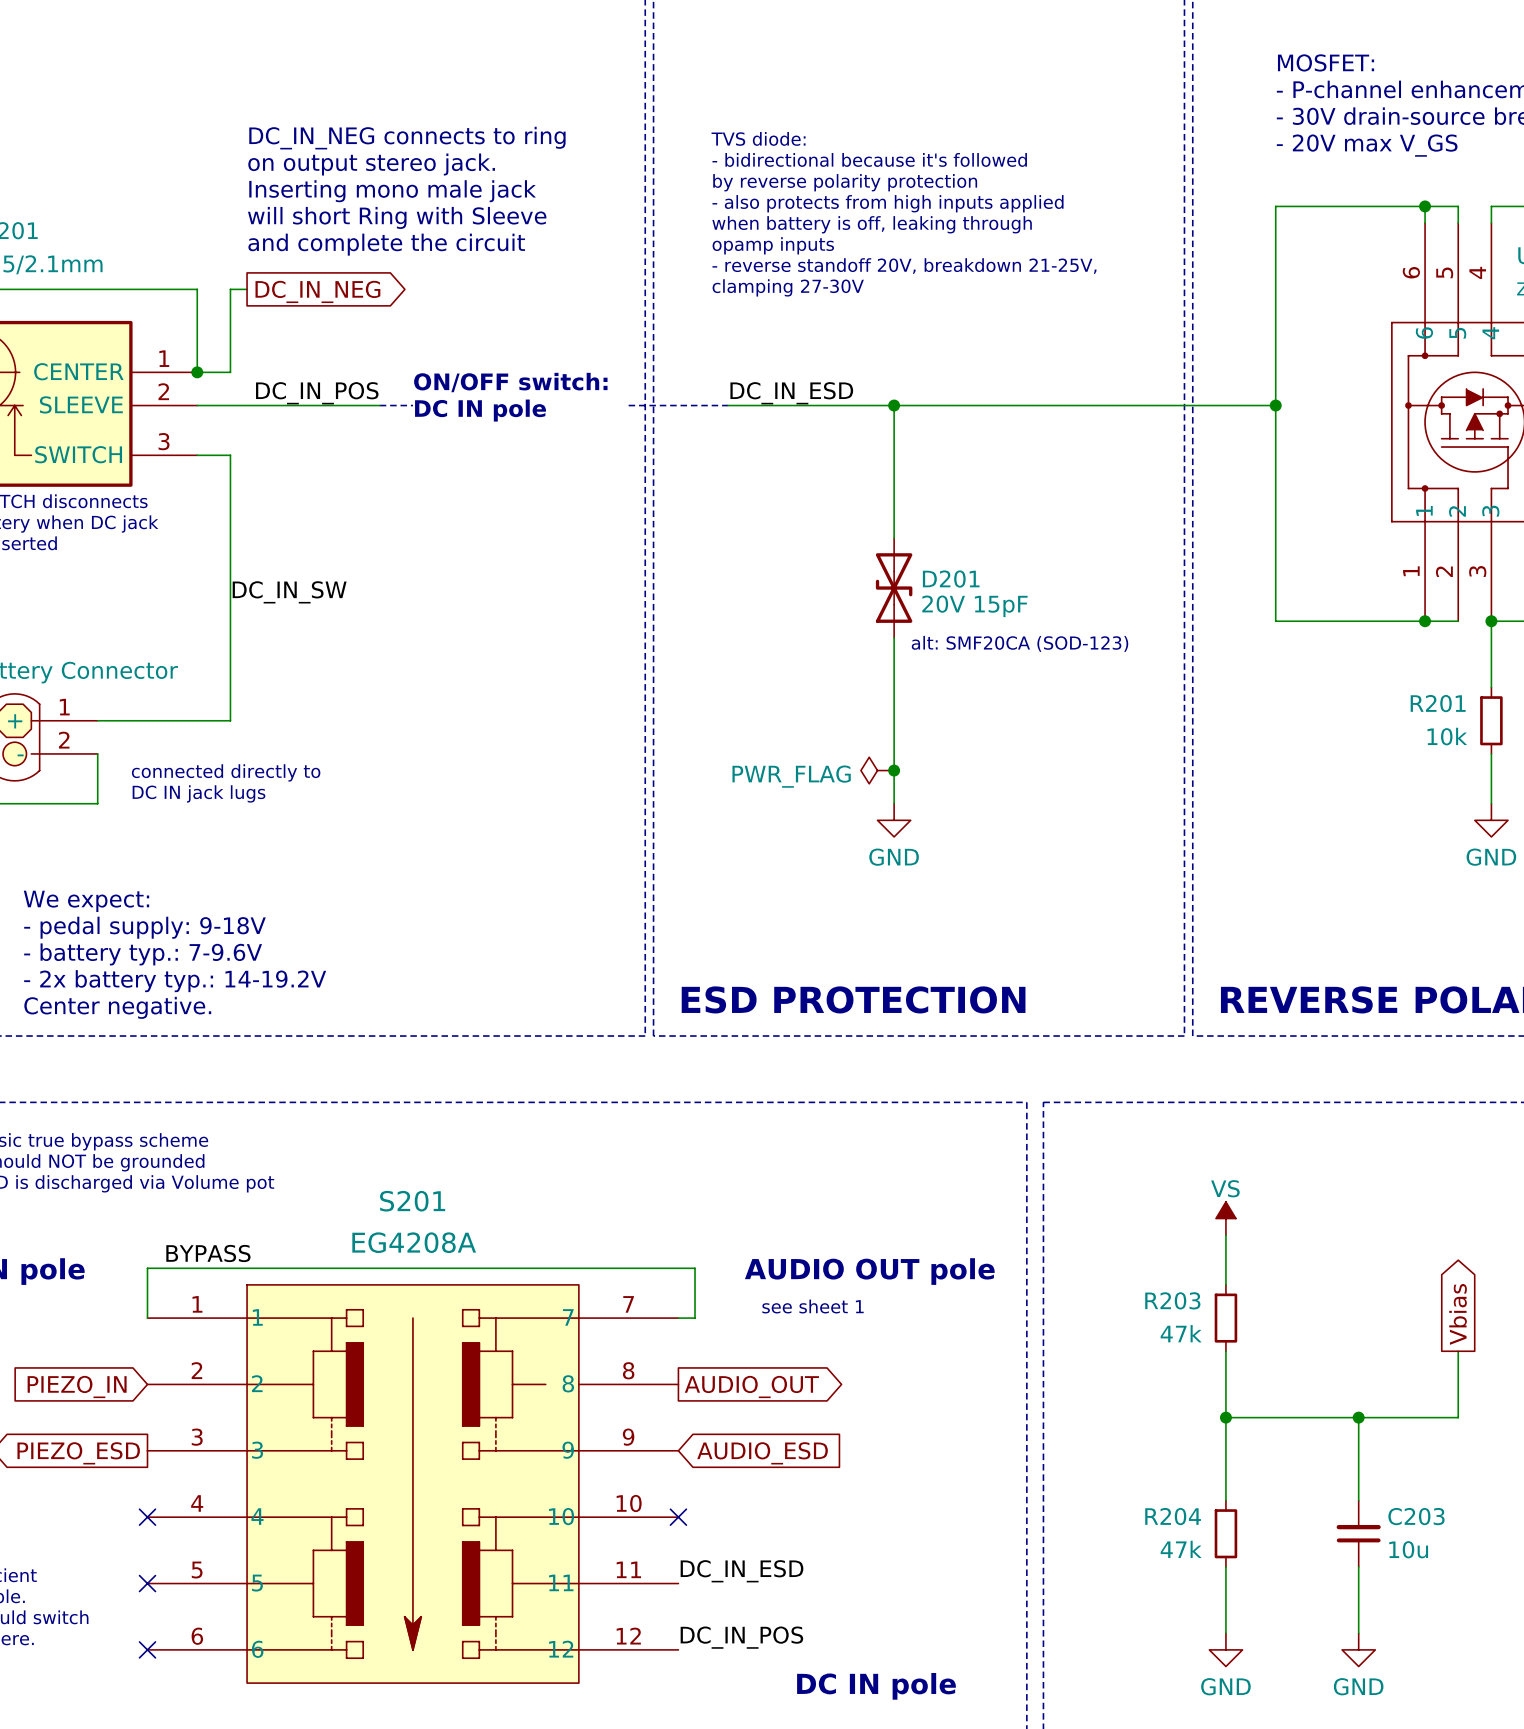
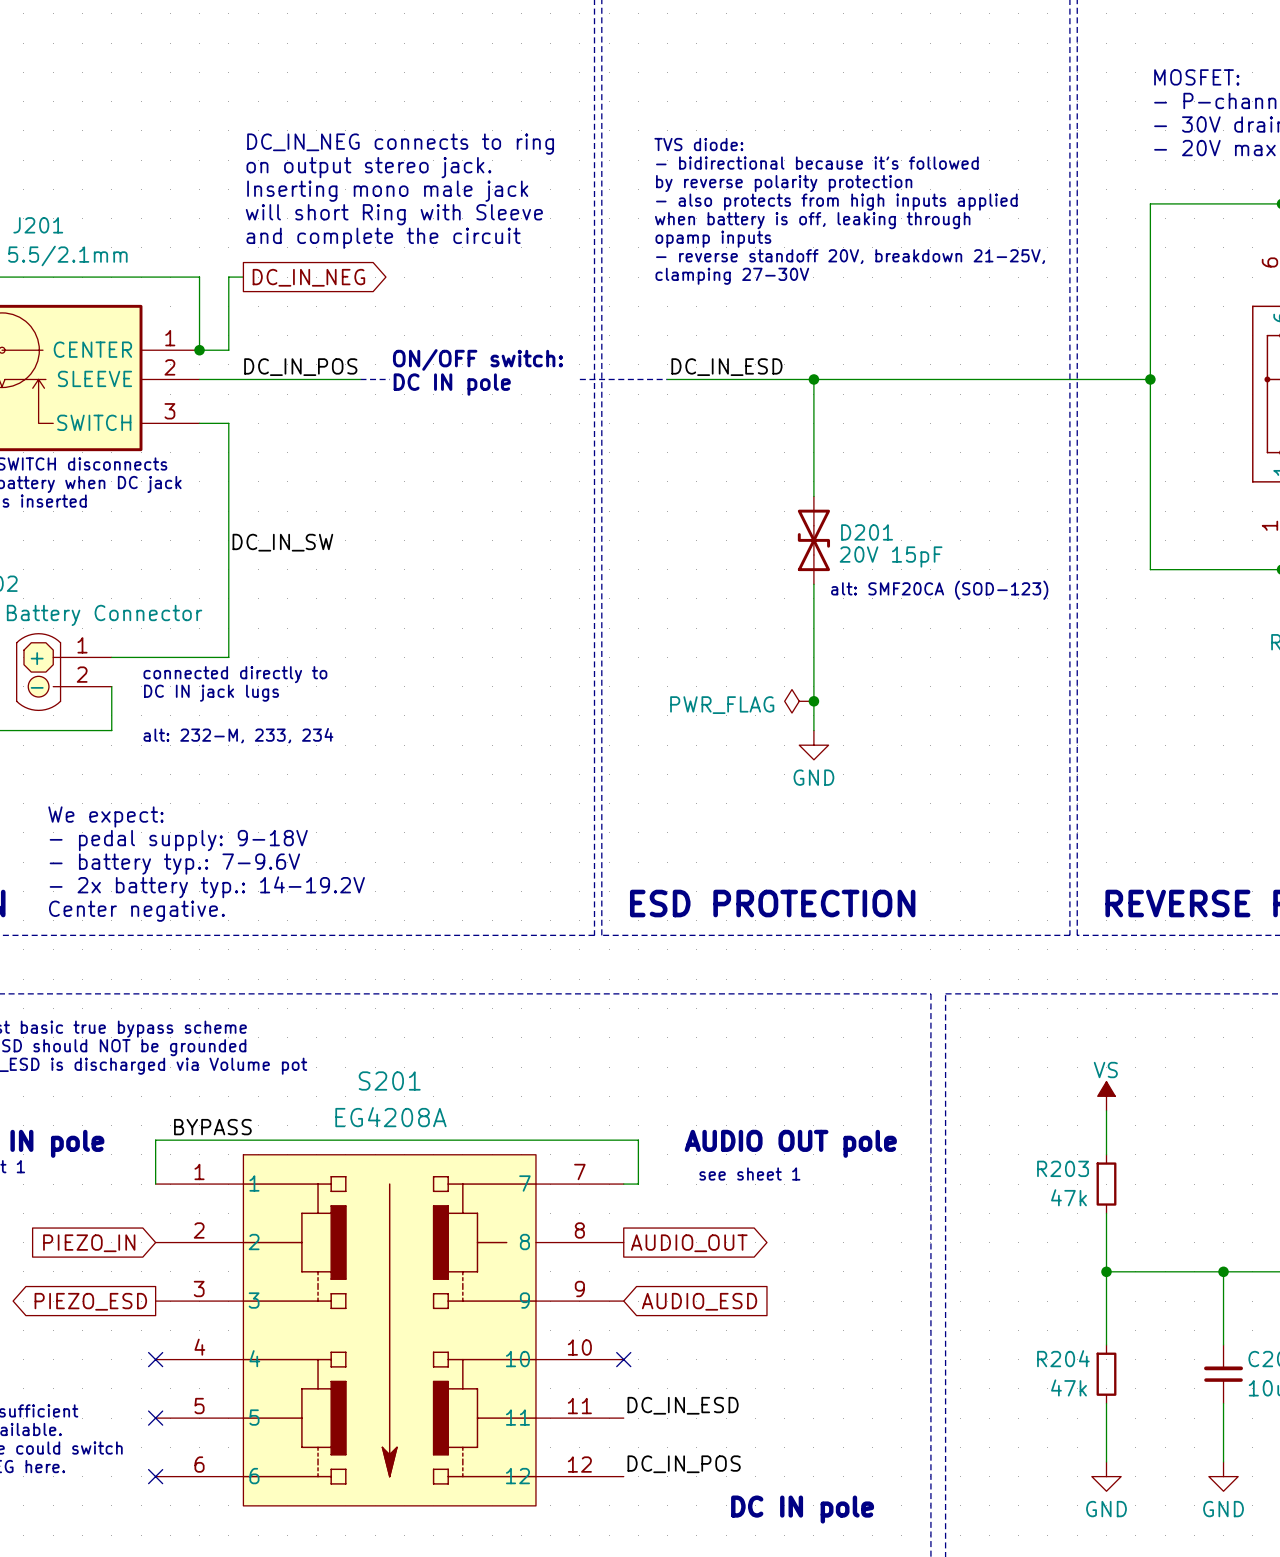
text: none -> connected directly to (235, 674)
text: connected directly to (226, 772) -> DC IN jack lugs (211, 693)
text: DC IN jack lugs (199, 793) -> none
text: none -> alt: 232-M, 233, 234 (238, 735)

